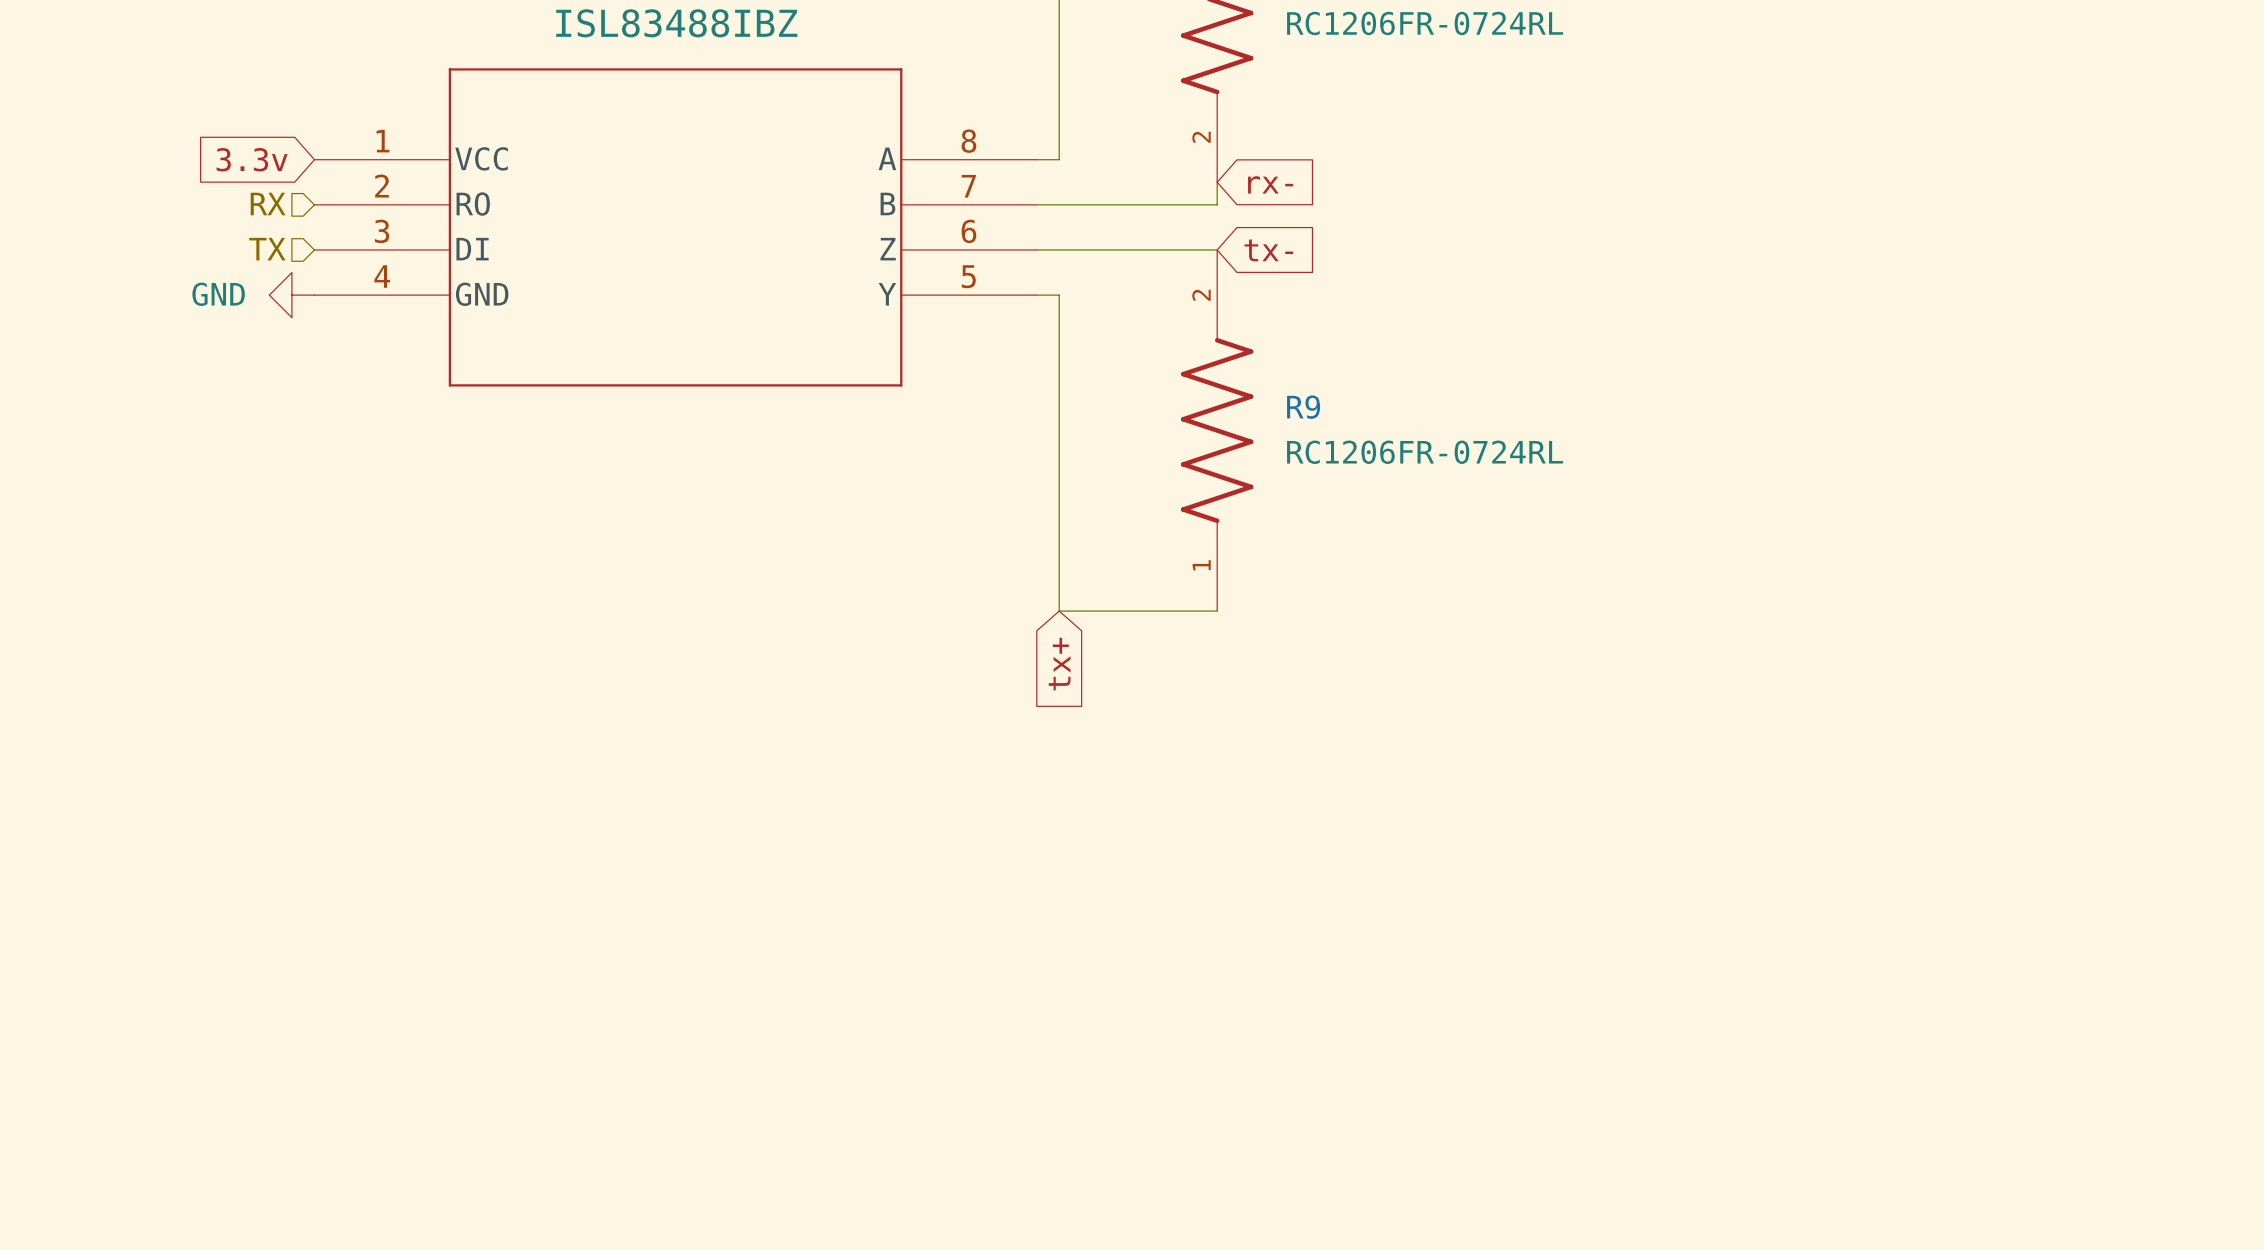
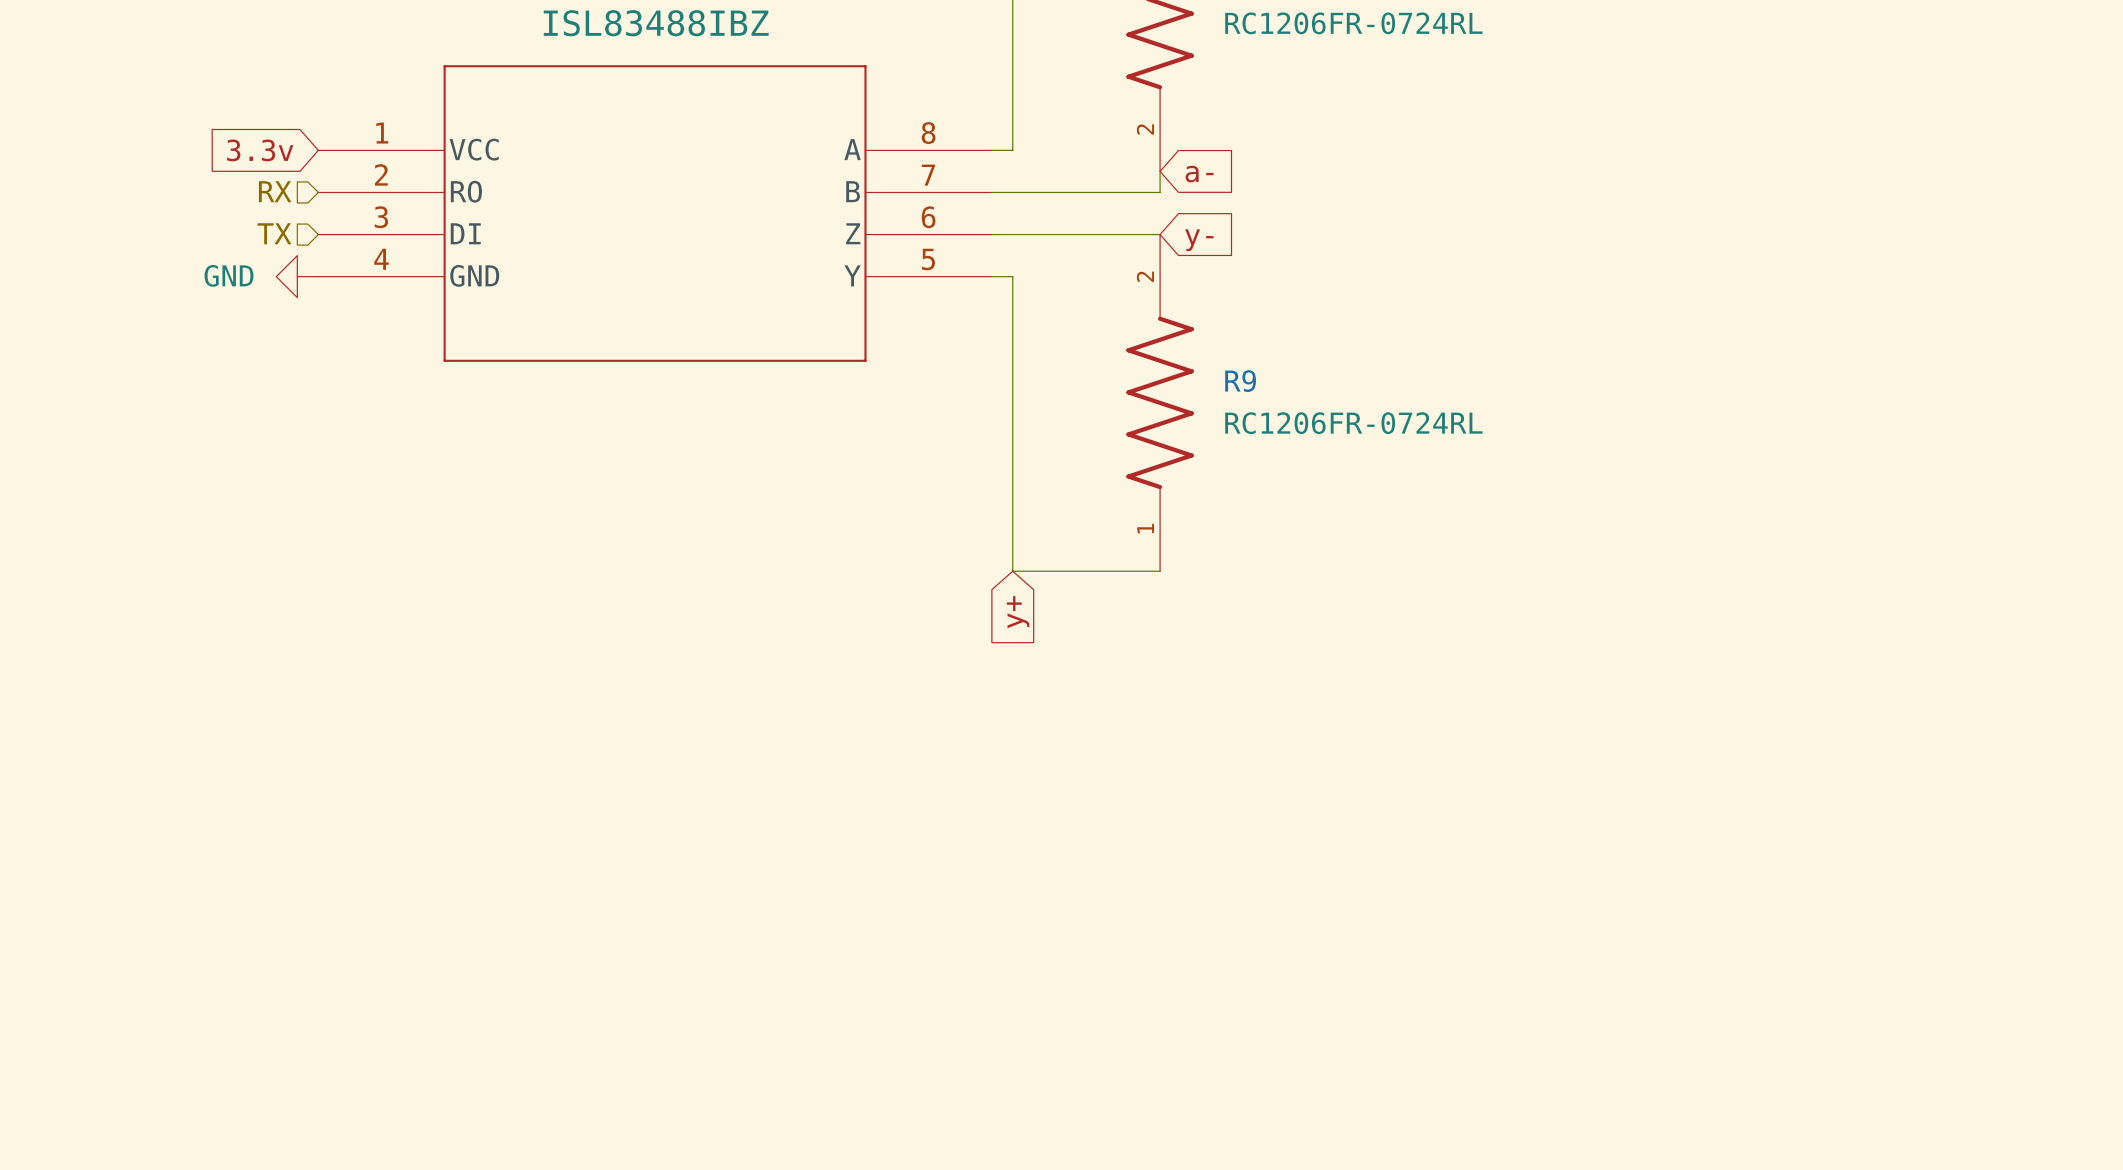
global label: rx- (1270, 184) -> a- (1199, 174)
global label: tx- (1268, 250) -> y- (1199, 240)
global label: tx+ (1059, 664) -> y+ (1018, 612)

